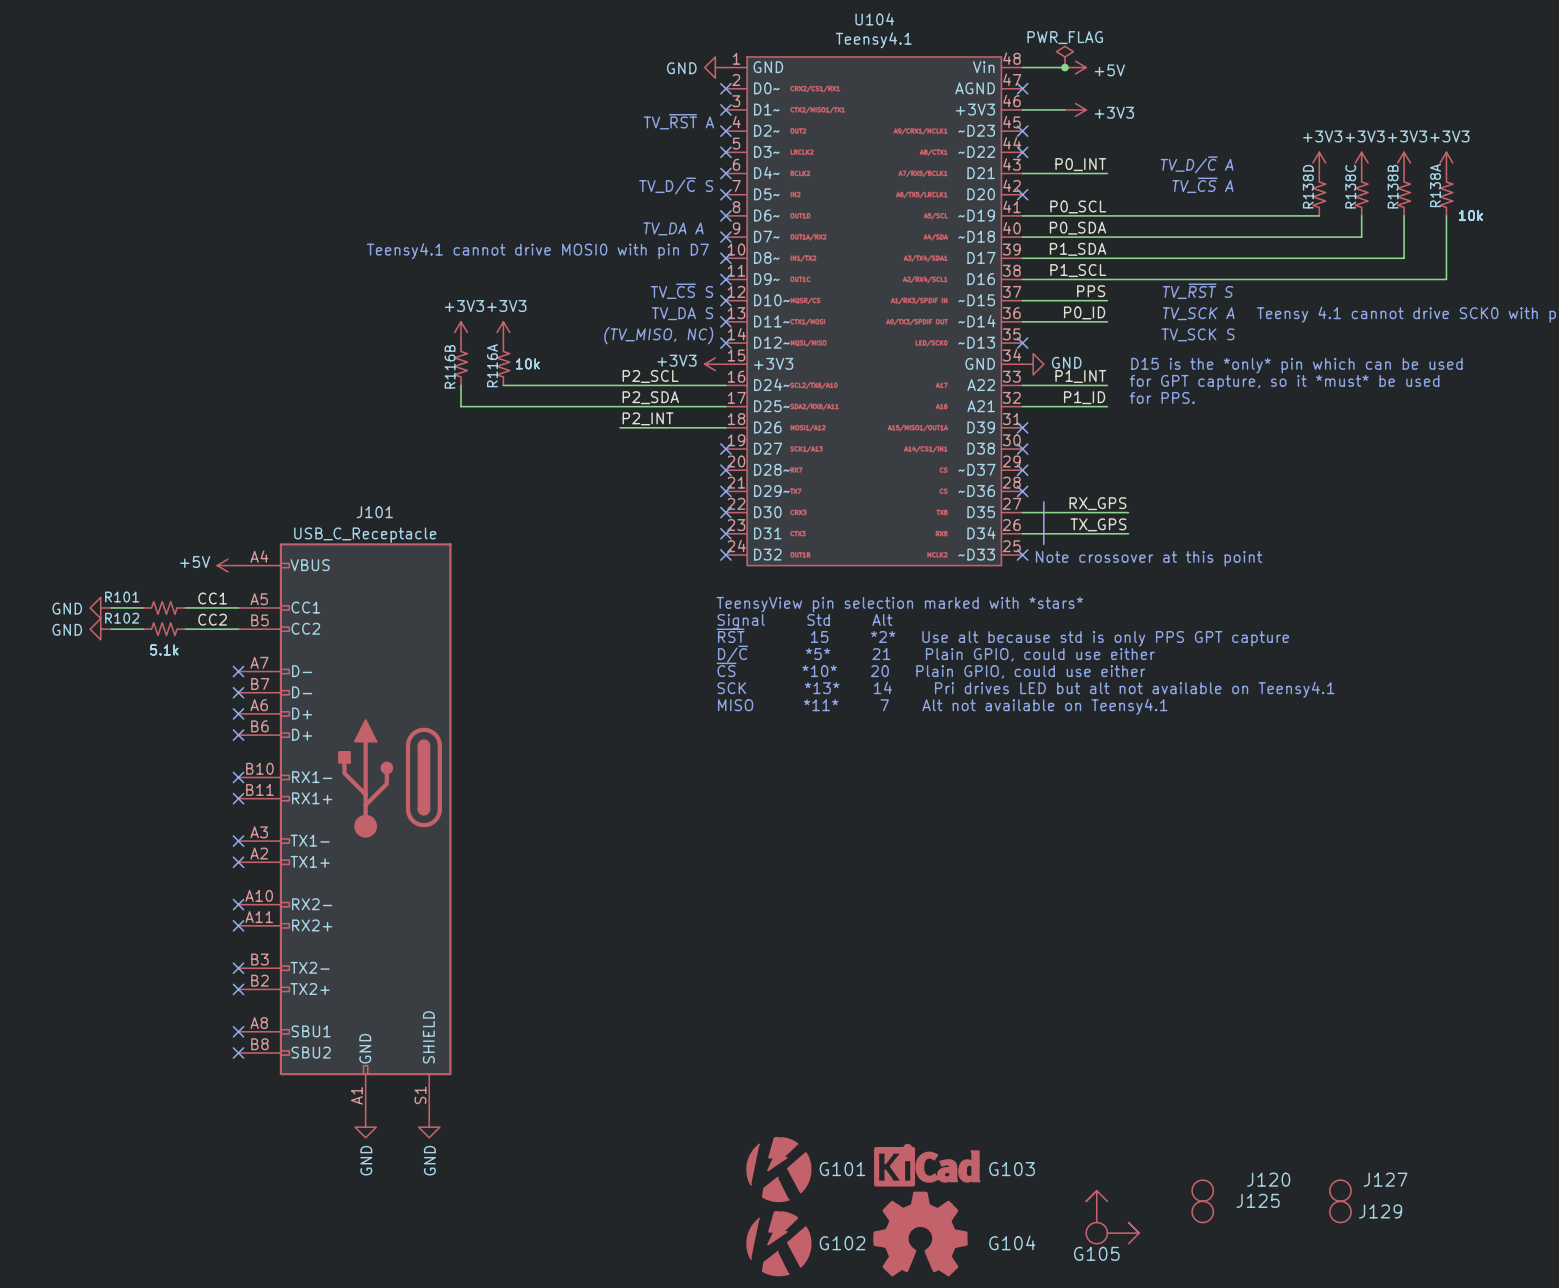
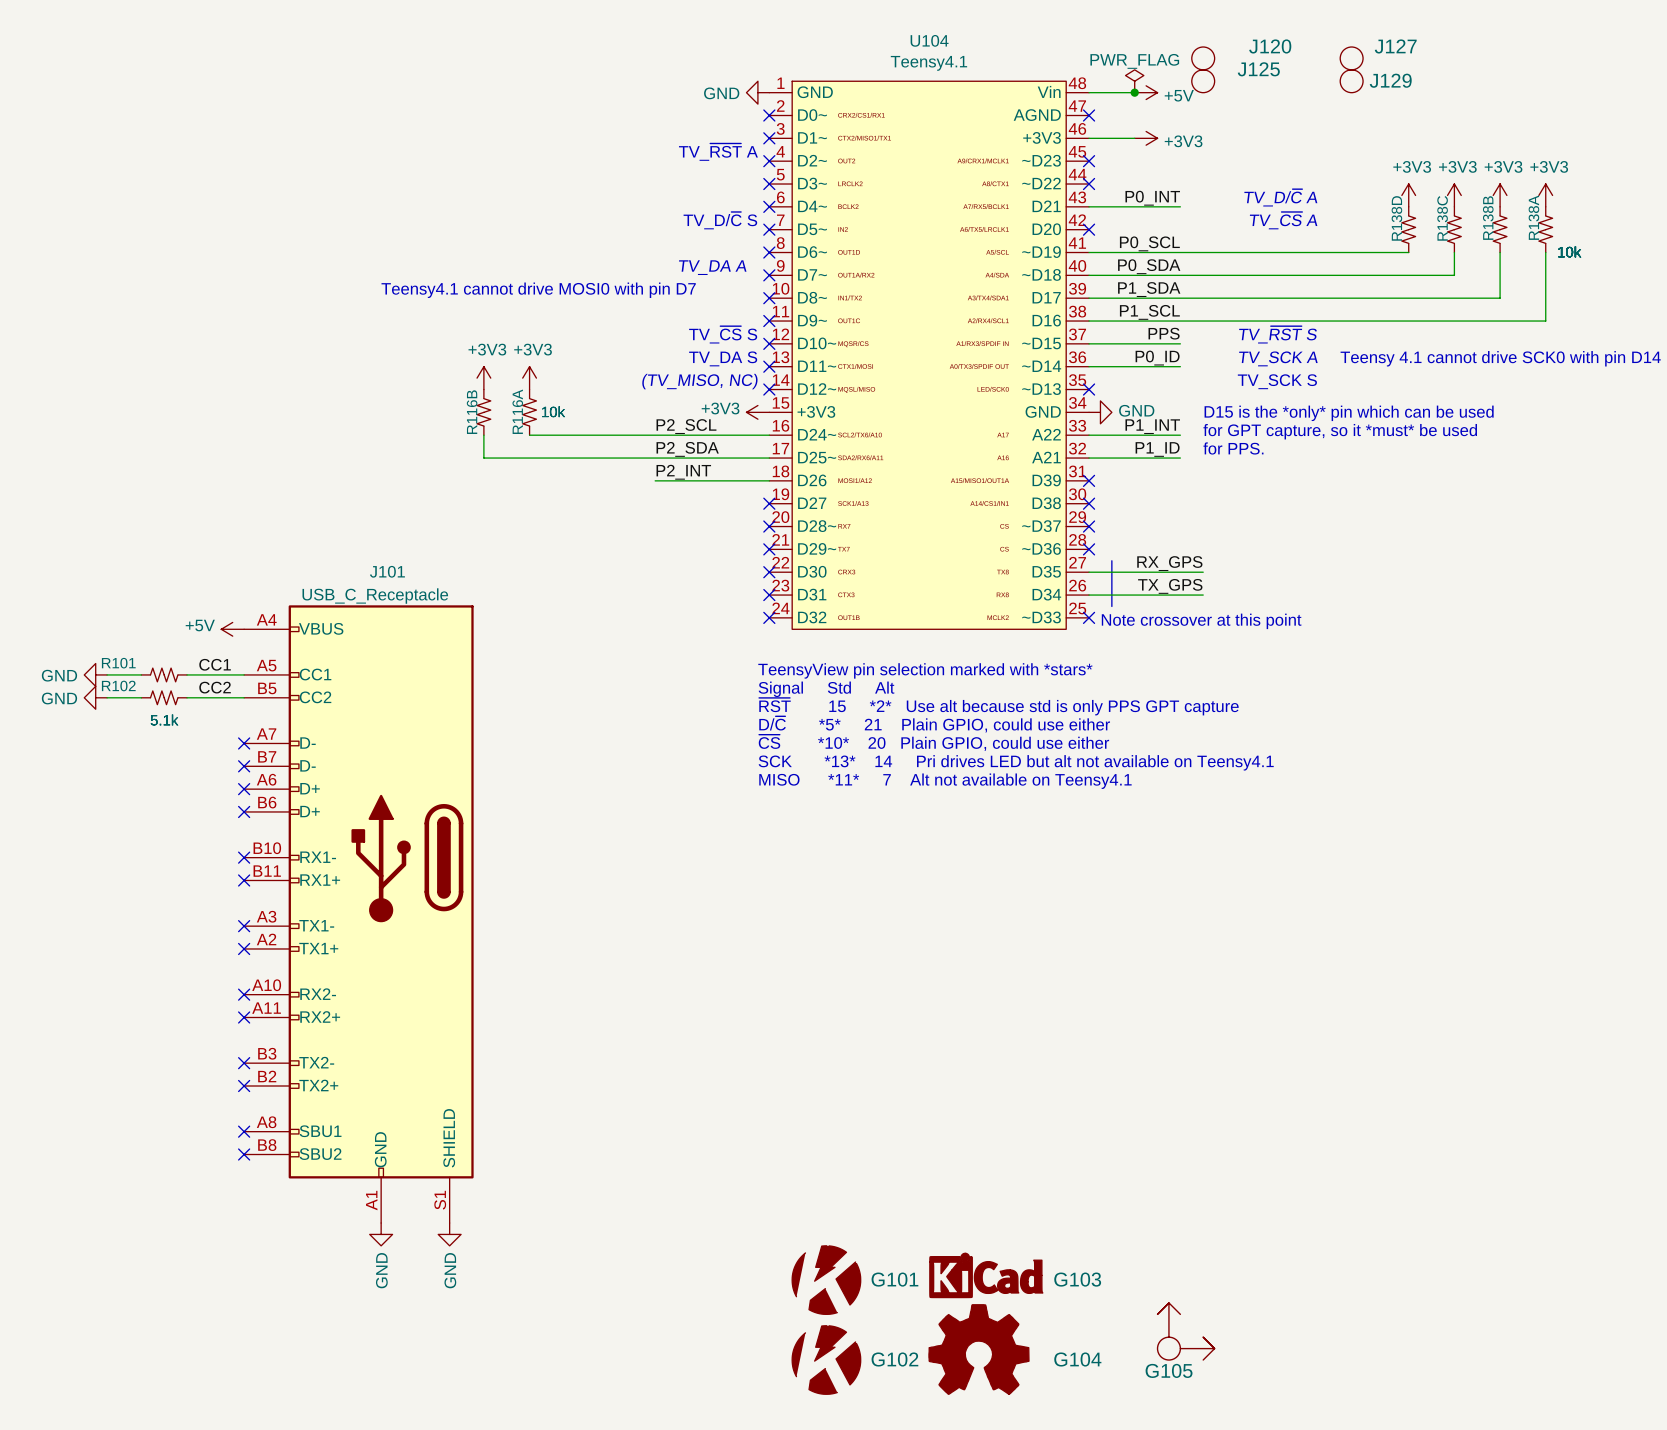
J120 position: (1202, 1190) -> (1203, 58)
J127 position: (1340, 1190) -> (1351, 58)
J125 position: (1202, 1211) -> (1203, 81)
J129 position: (1340, 1211) -> (1351, 81)

